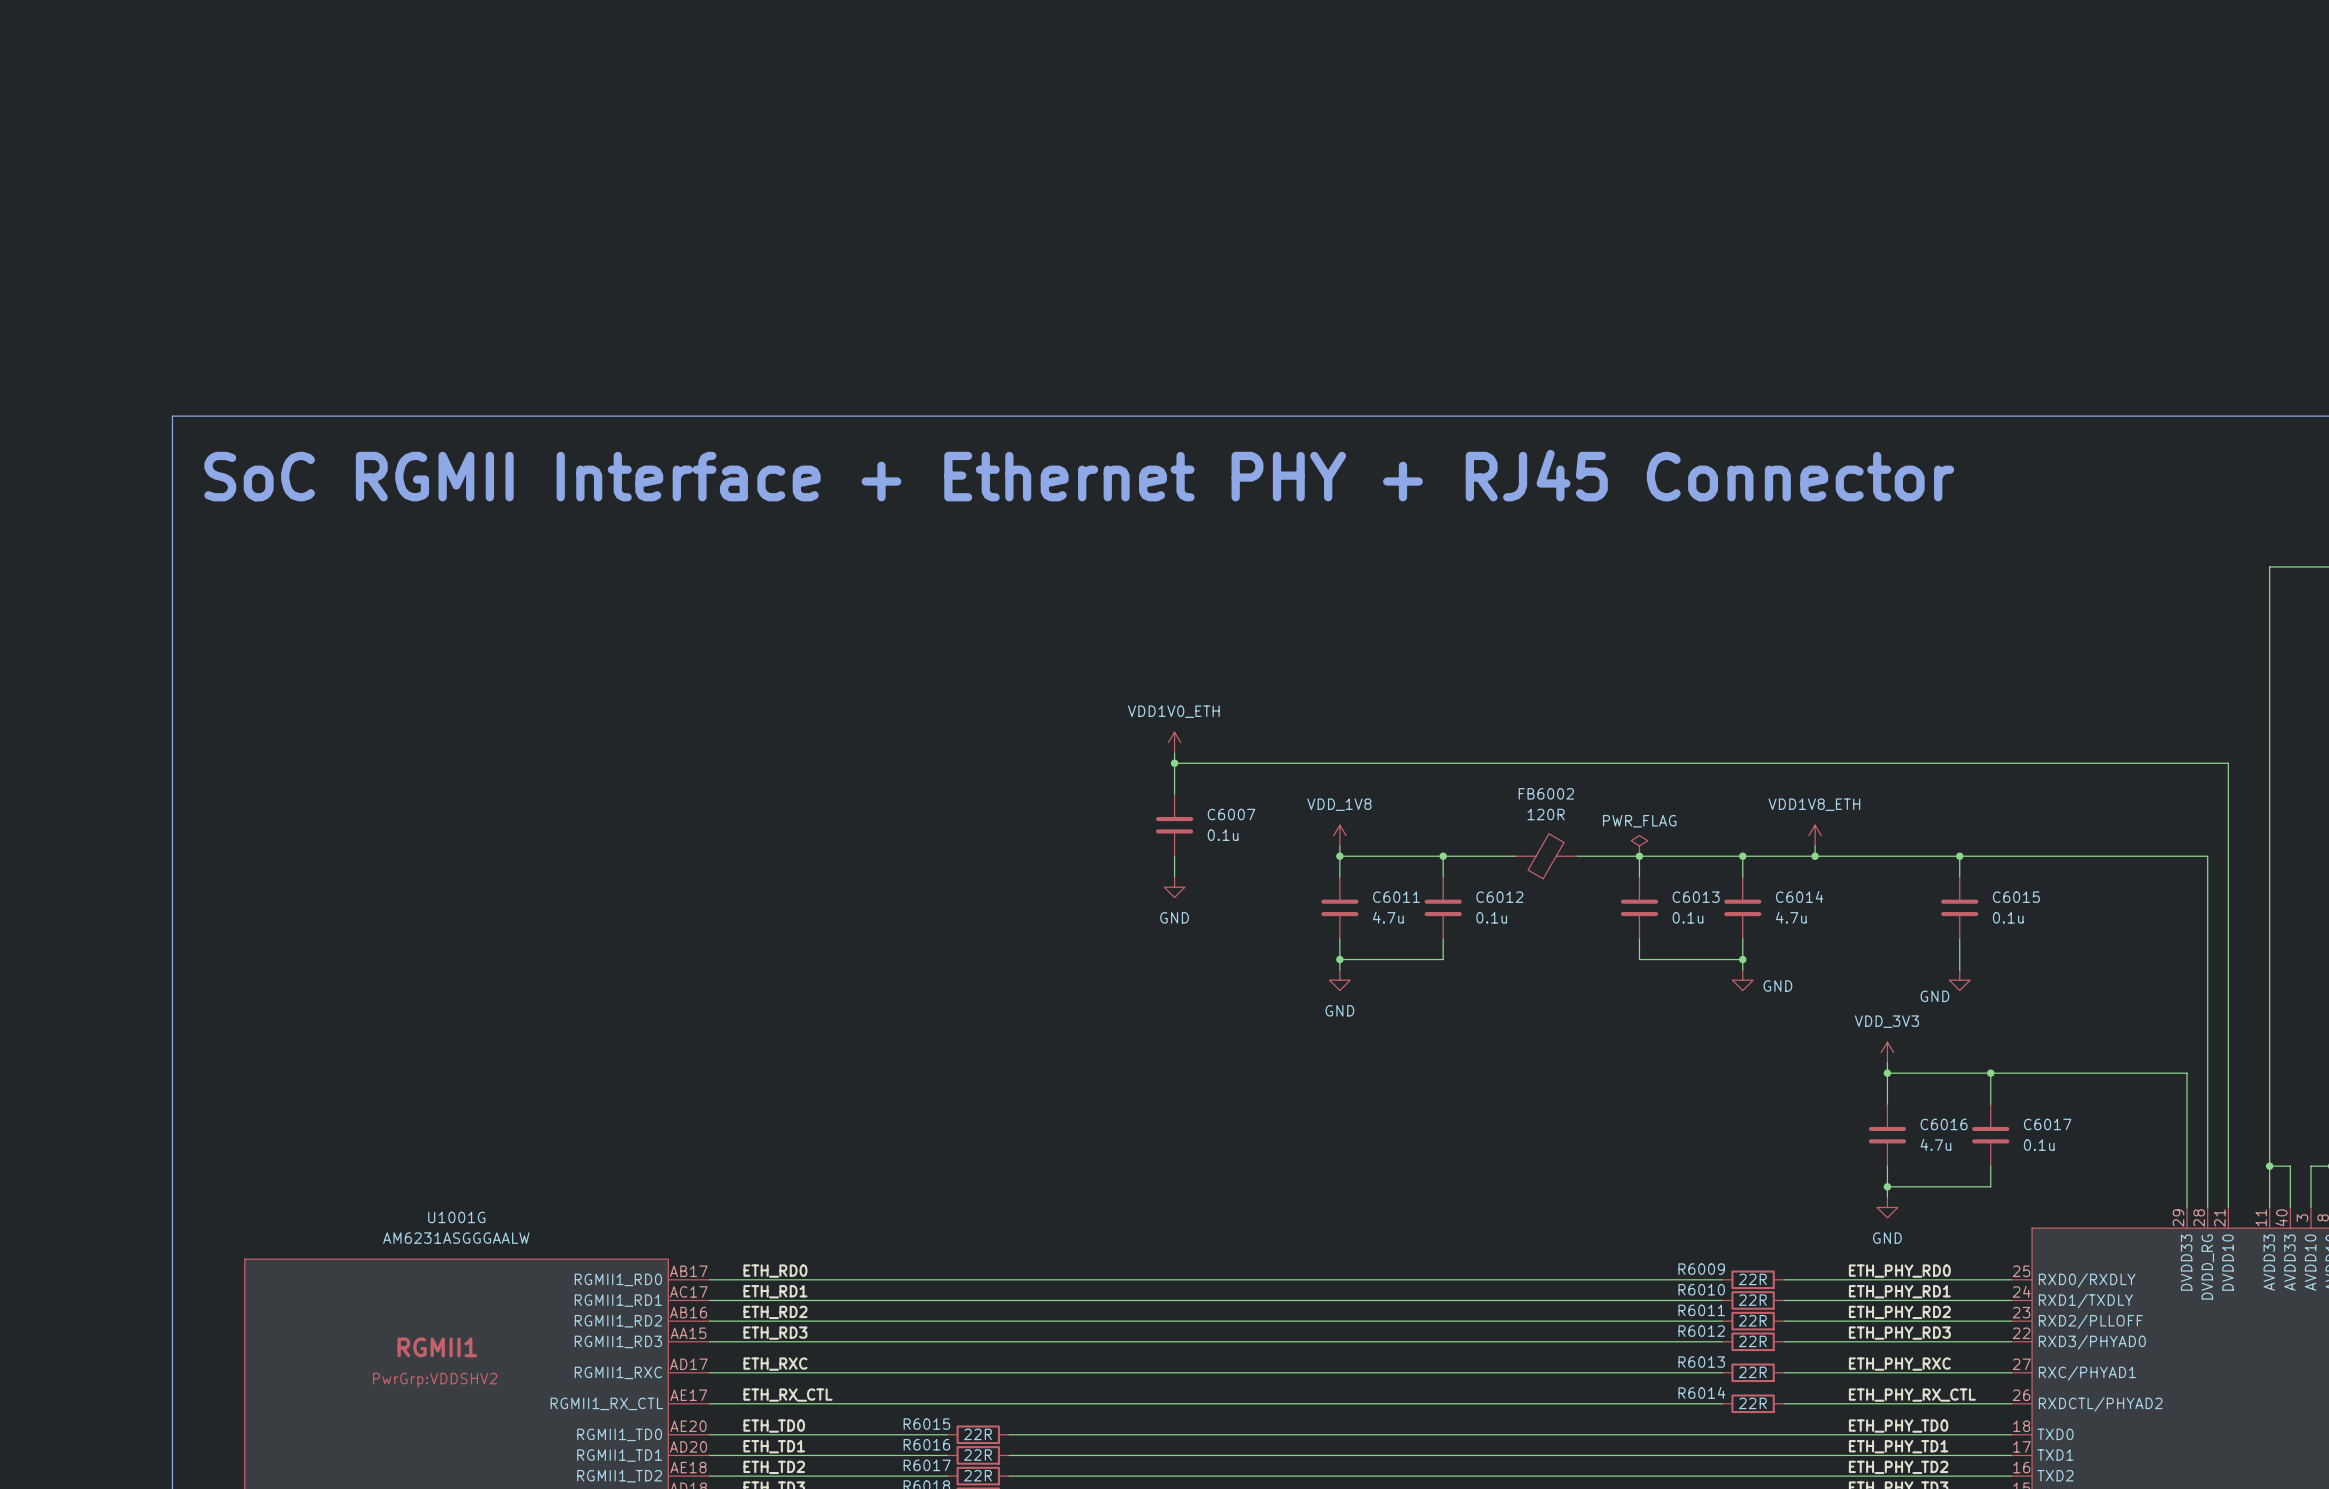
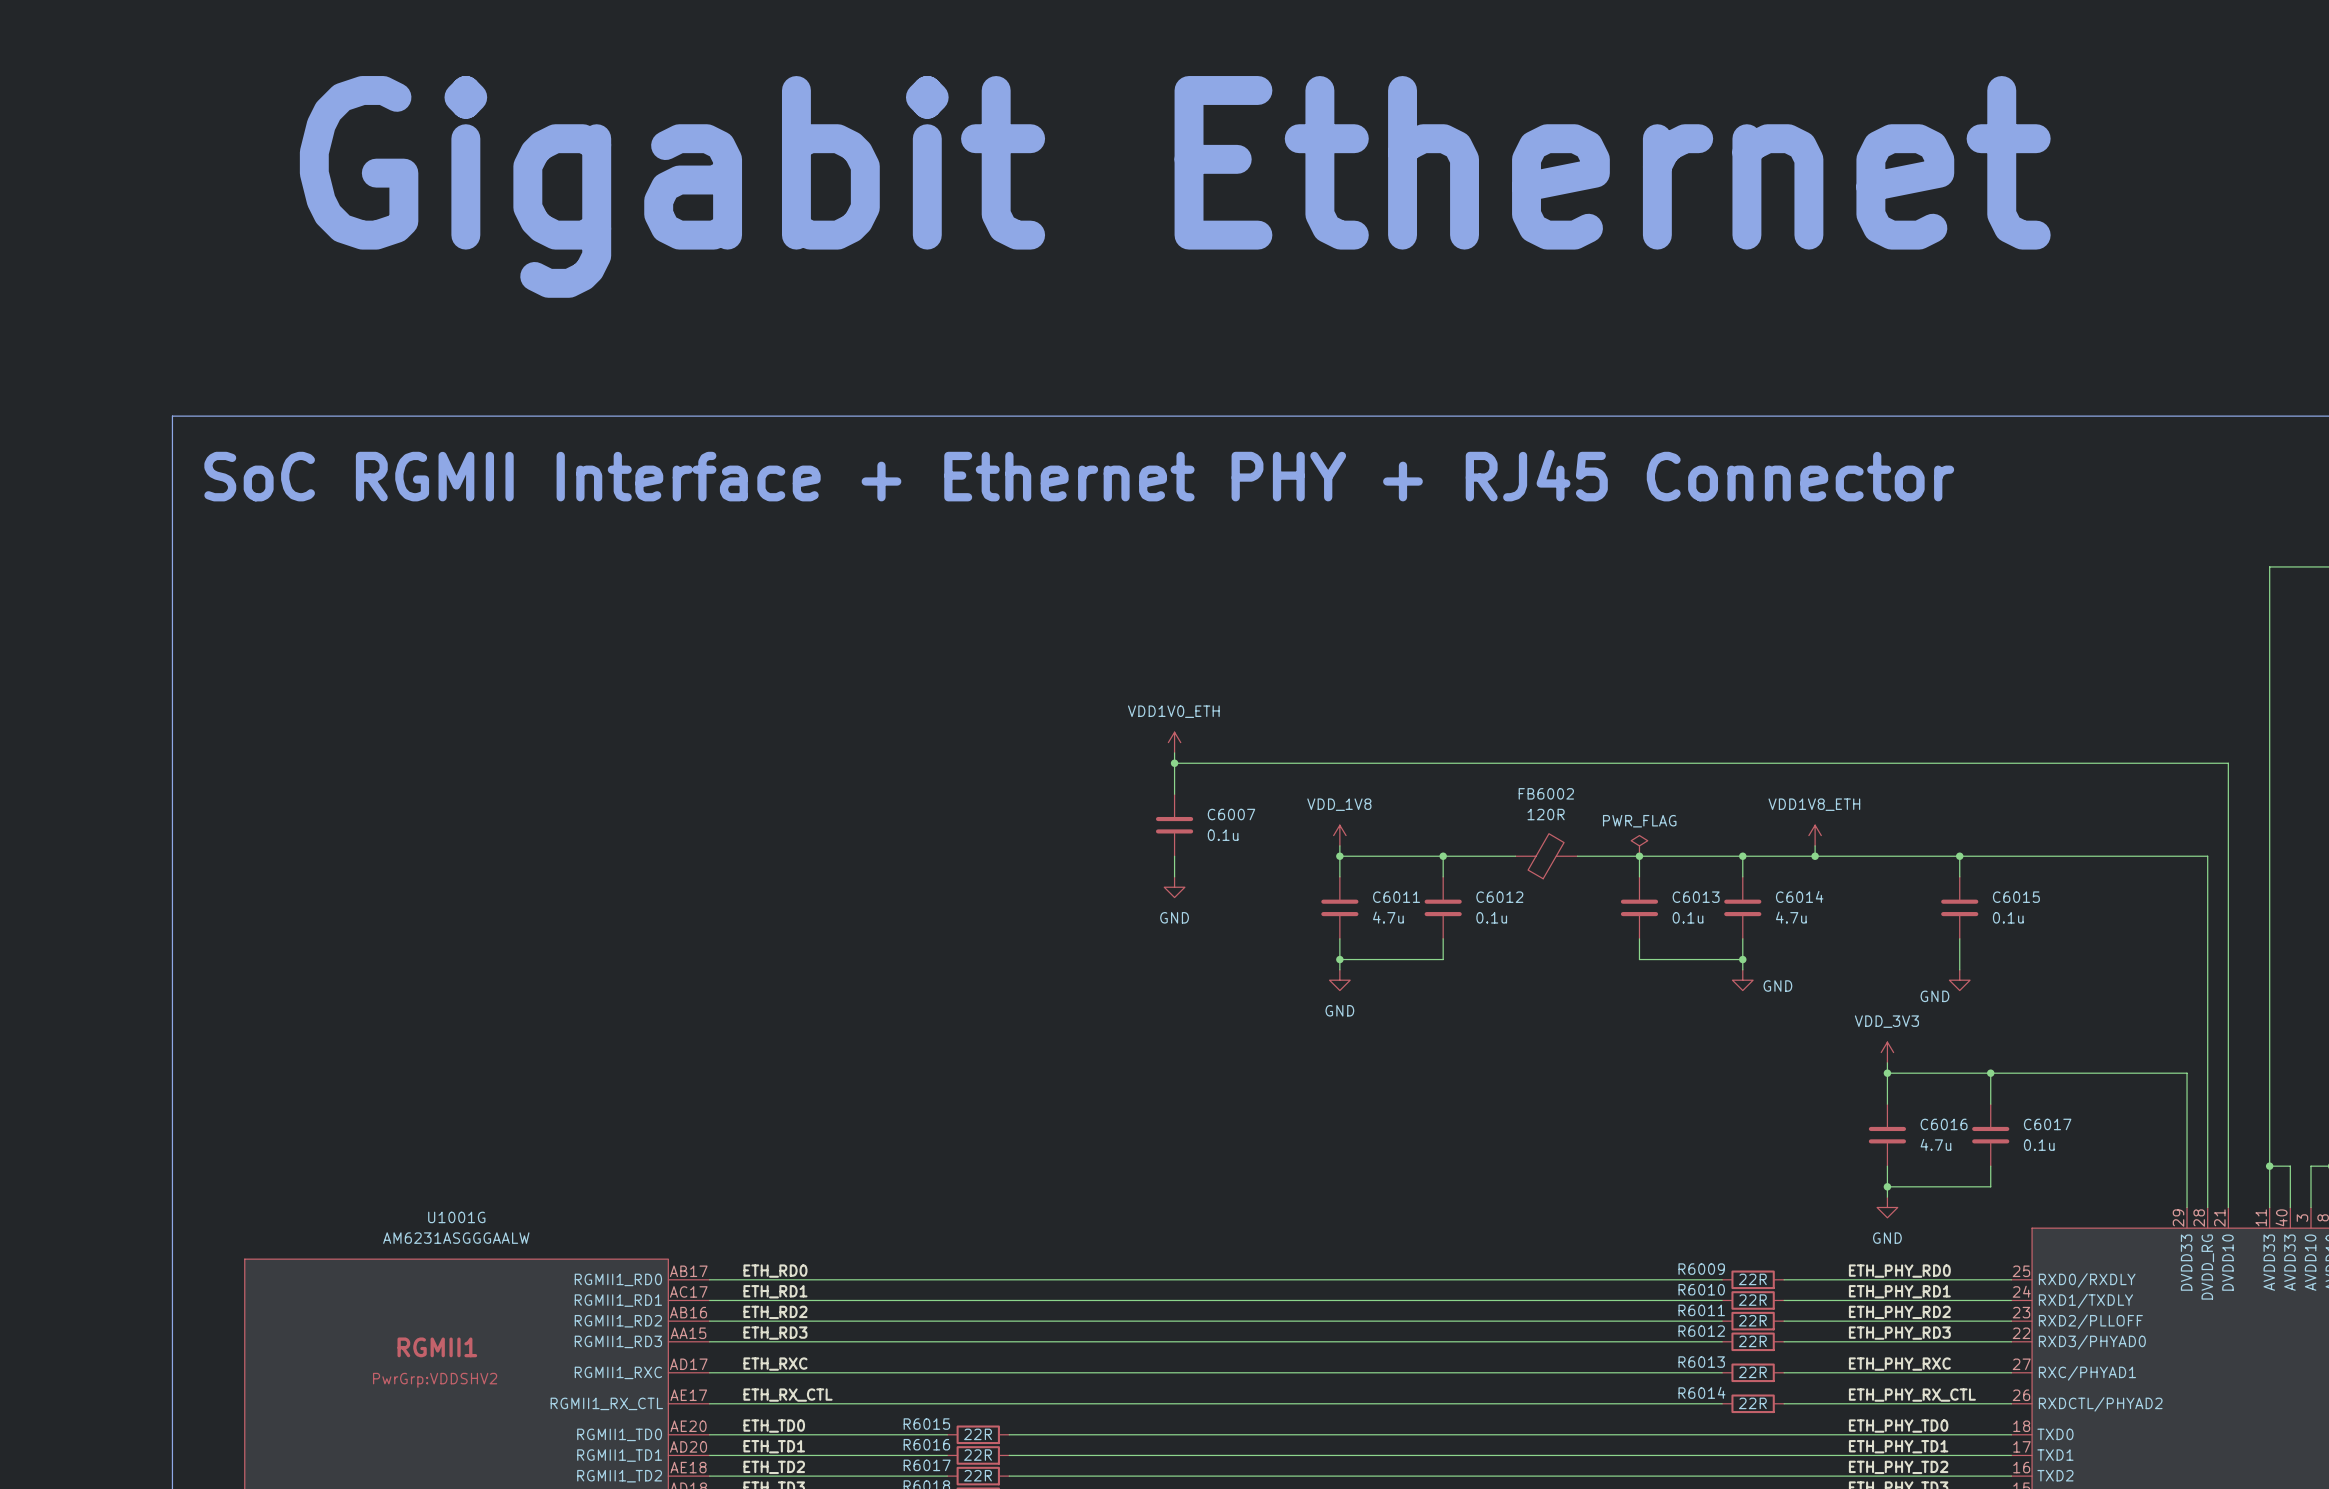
text: none -> Gigabit Ethernet (1175, 186)

